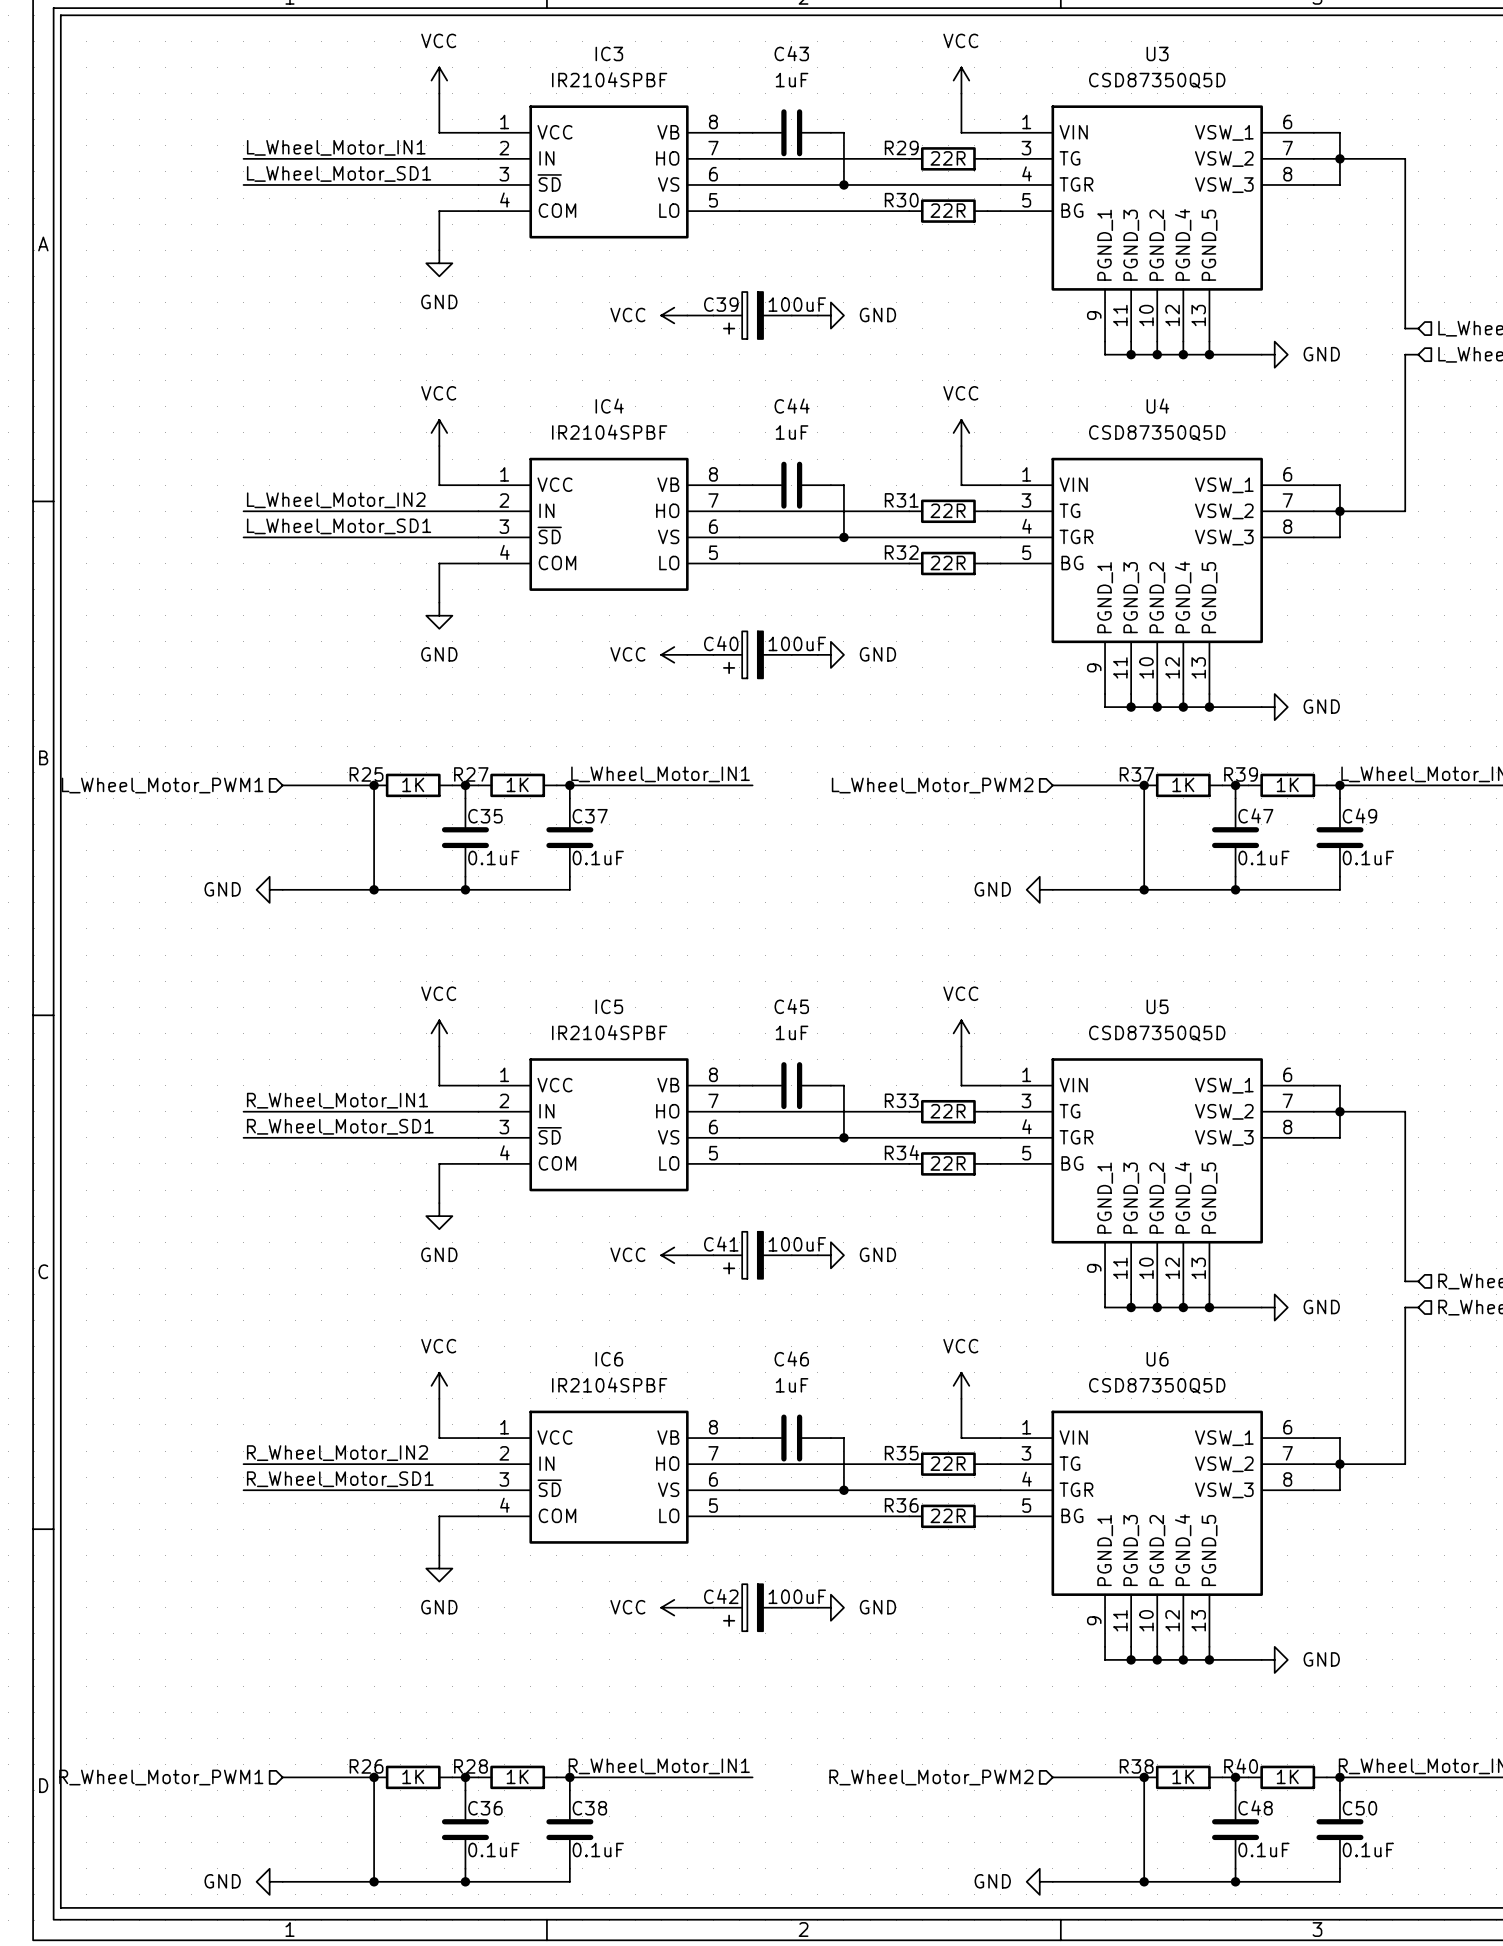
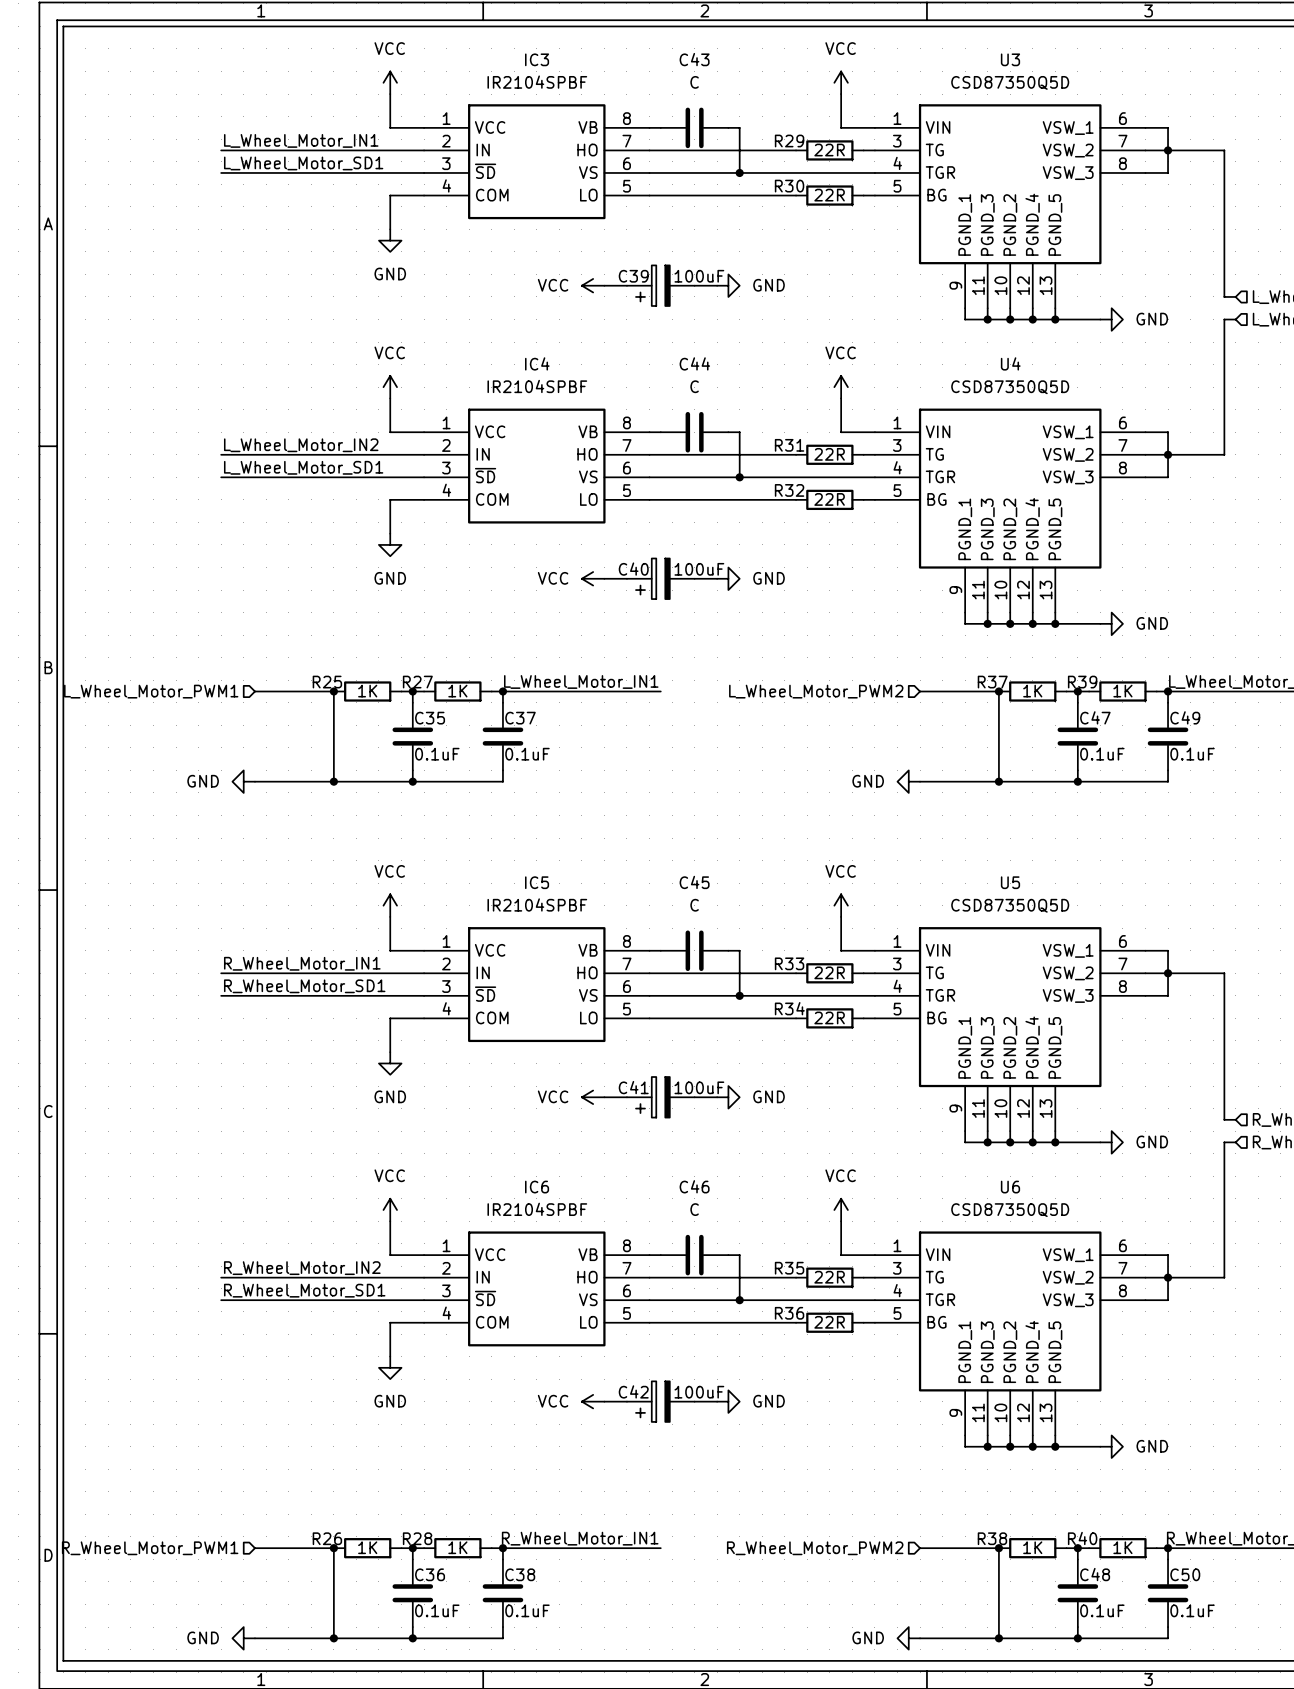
C43 value: 1uF (792, 80) -> C (694, 82)
C44 value: 1uF (792, 432) -> C (694, 386)
C45 value: 1uF (792, 1032) -> C (694, 905)
C46 value: 1uF (792, 1385) -> C (694, 1209)

